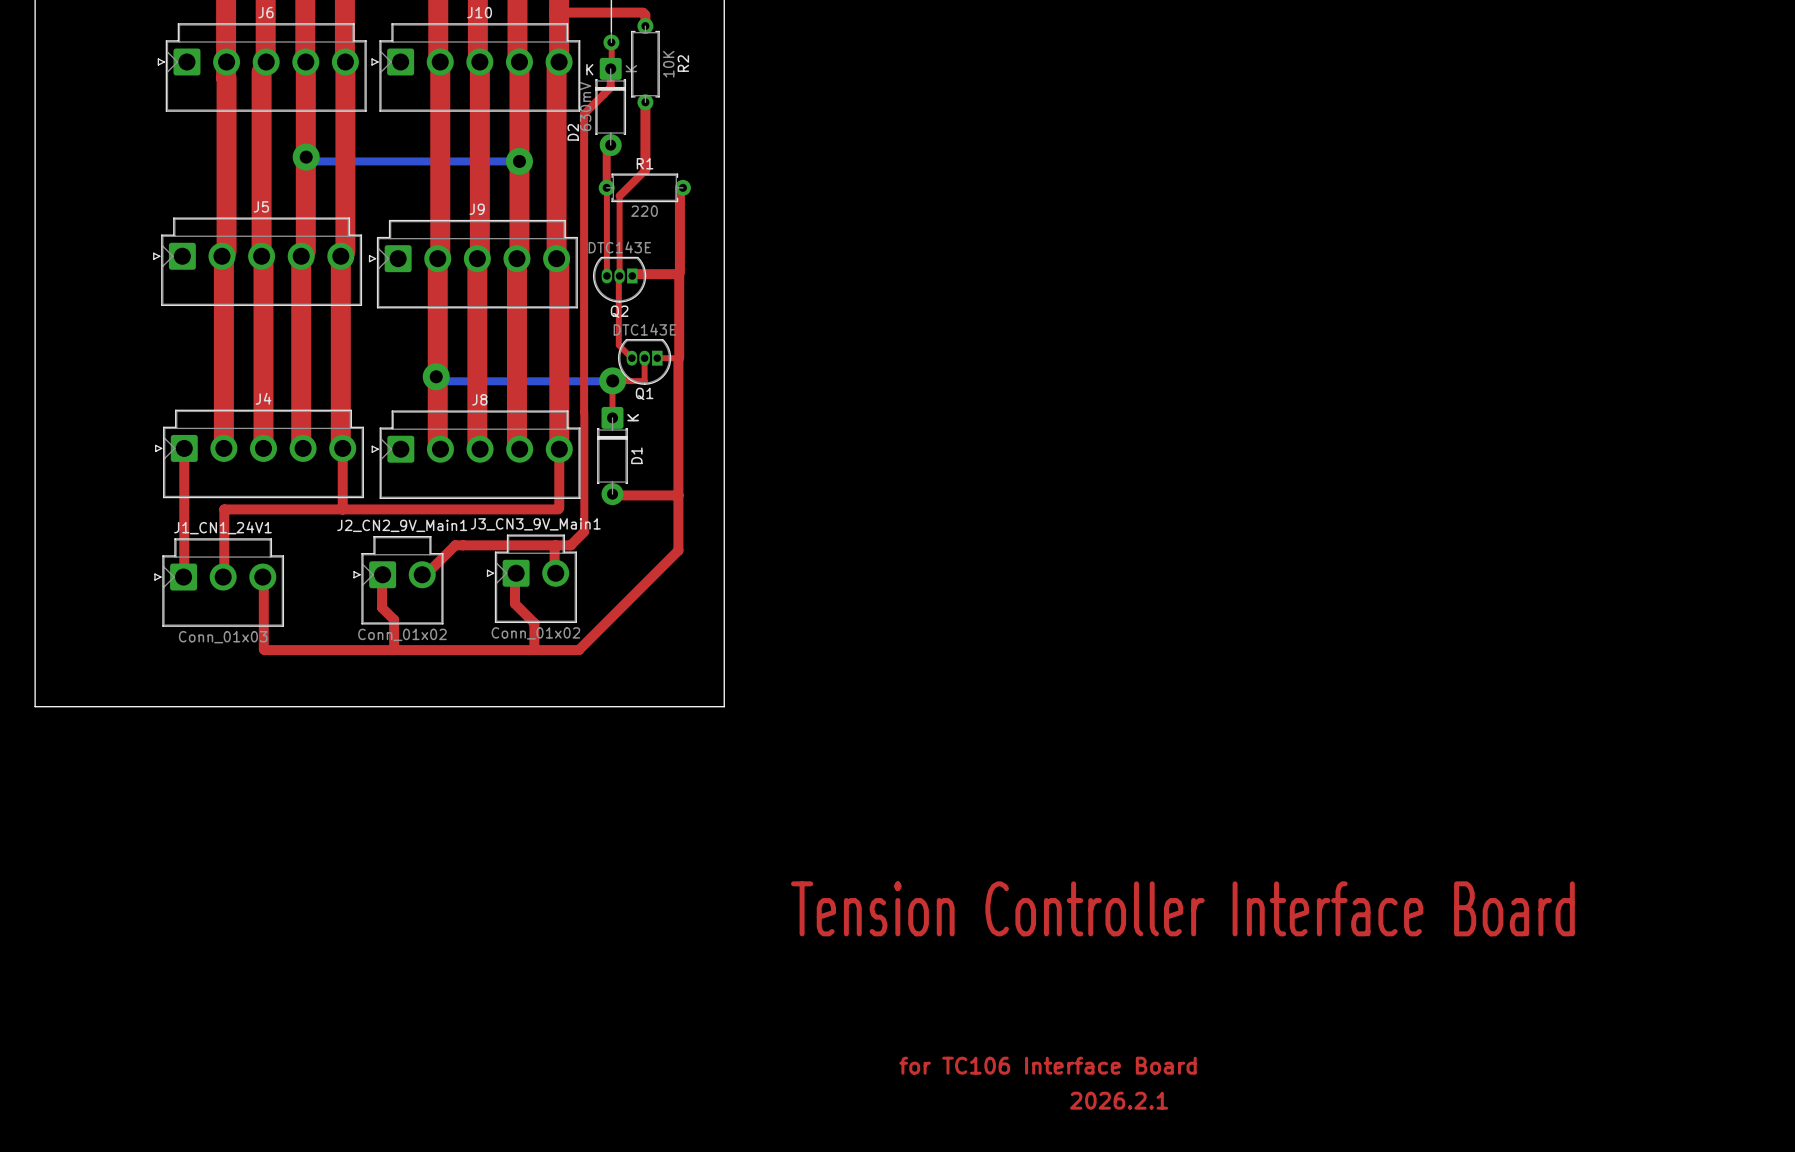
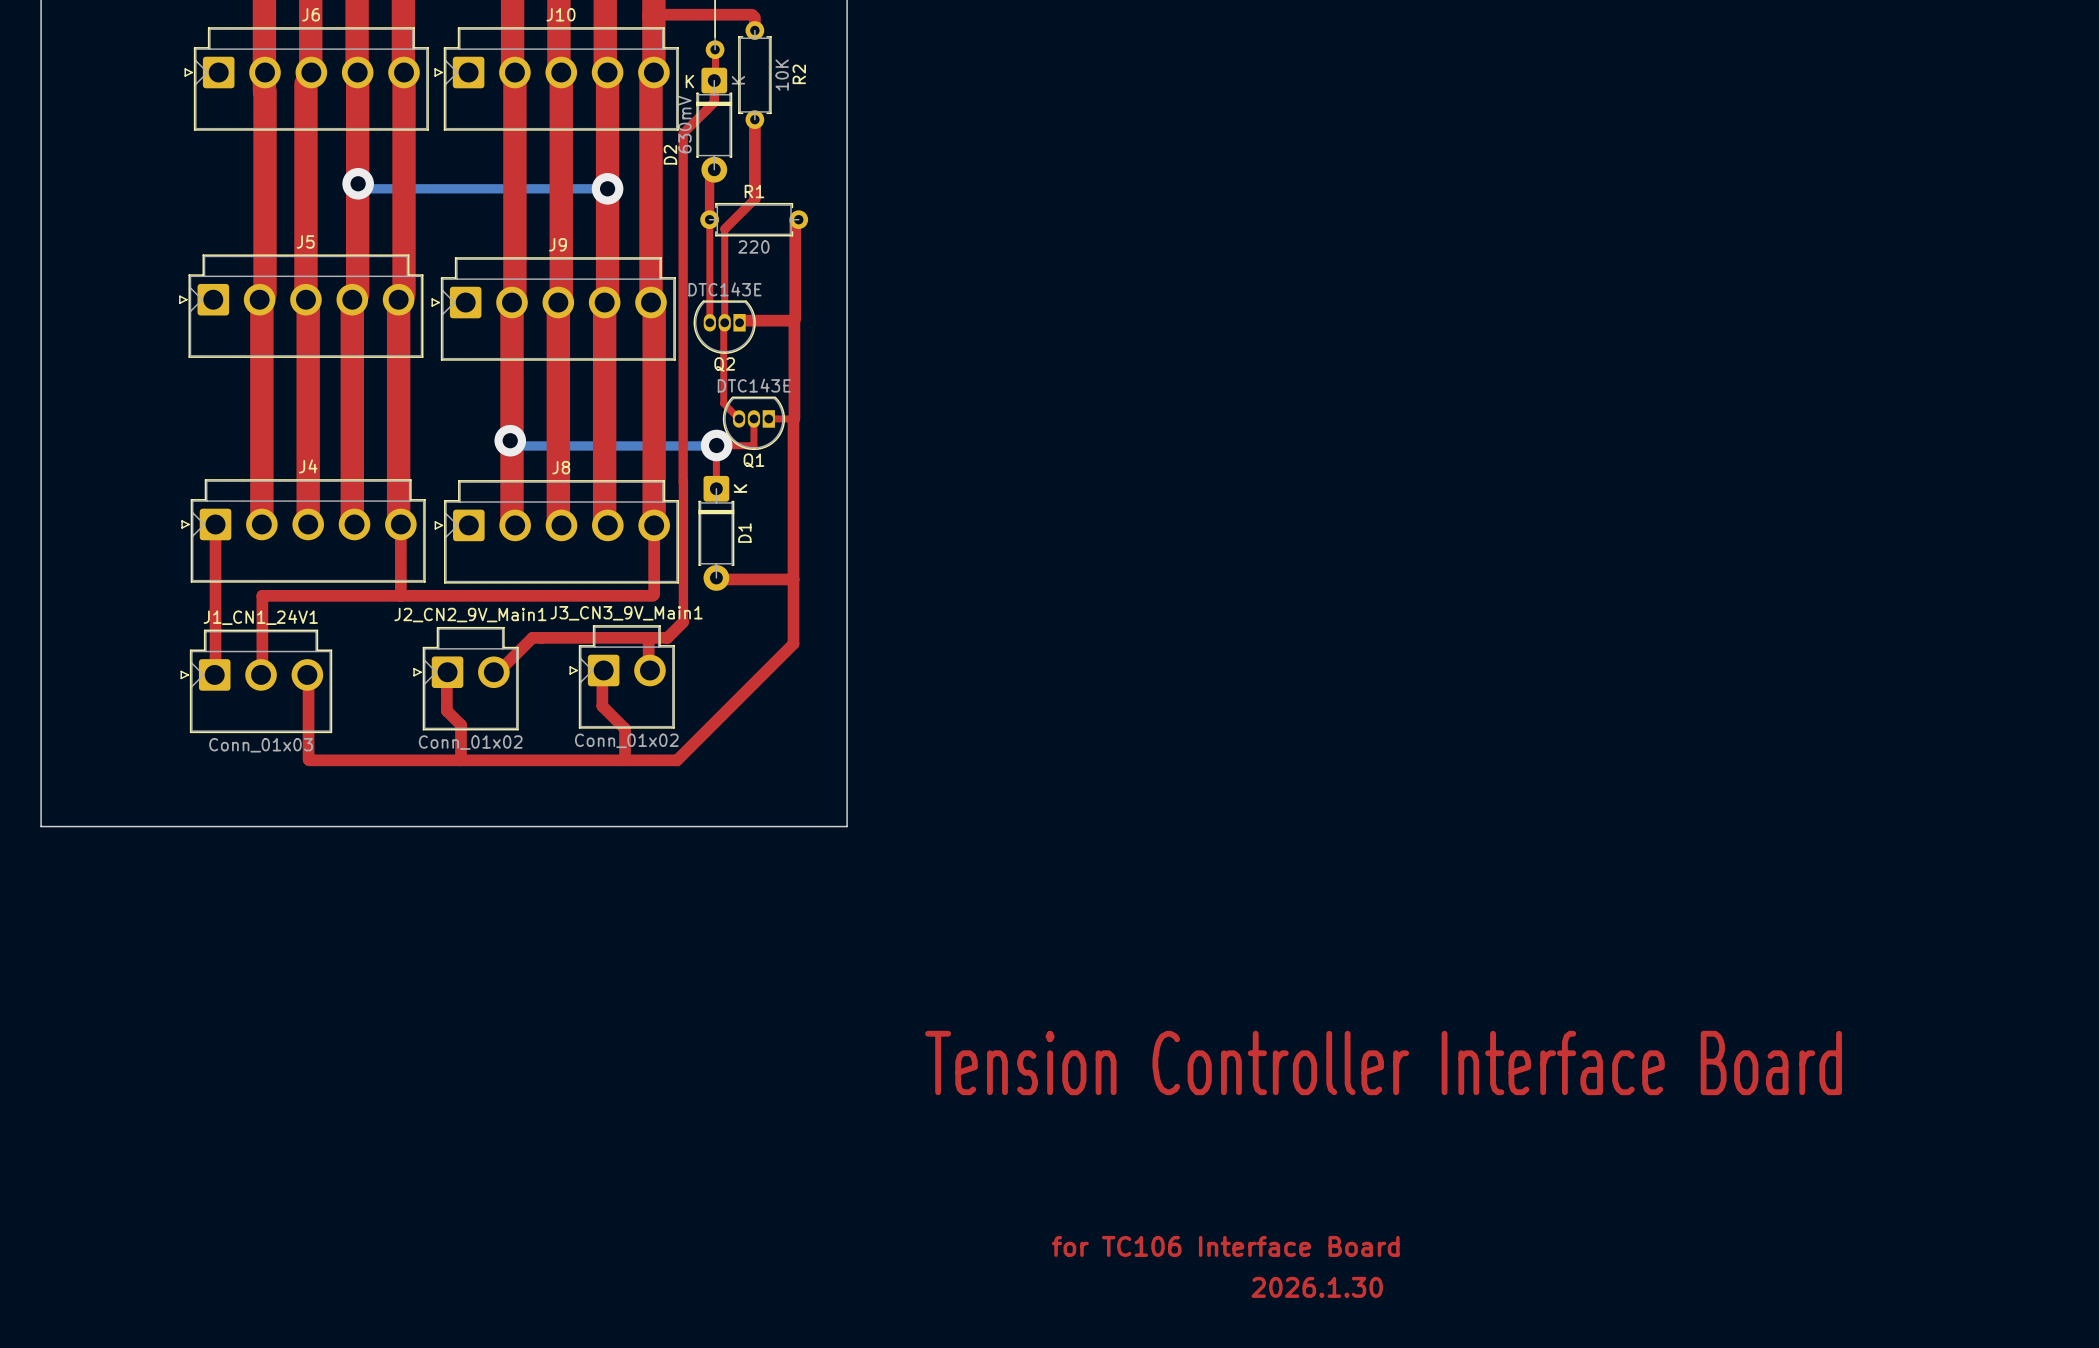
text: 2026.2.1 (1119, 1100) -> 2026.1.30 (1317, 1287)

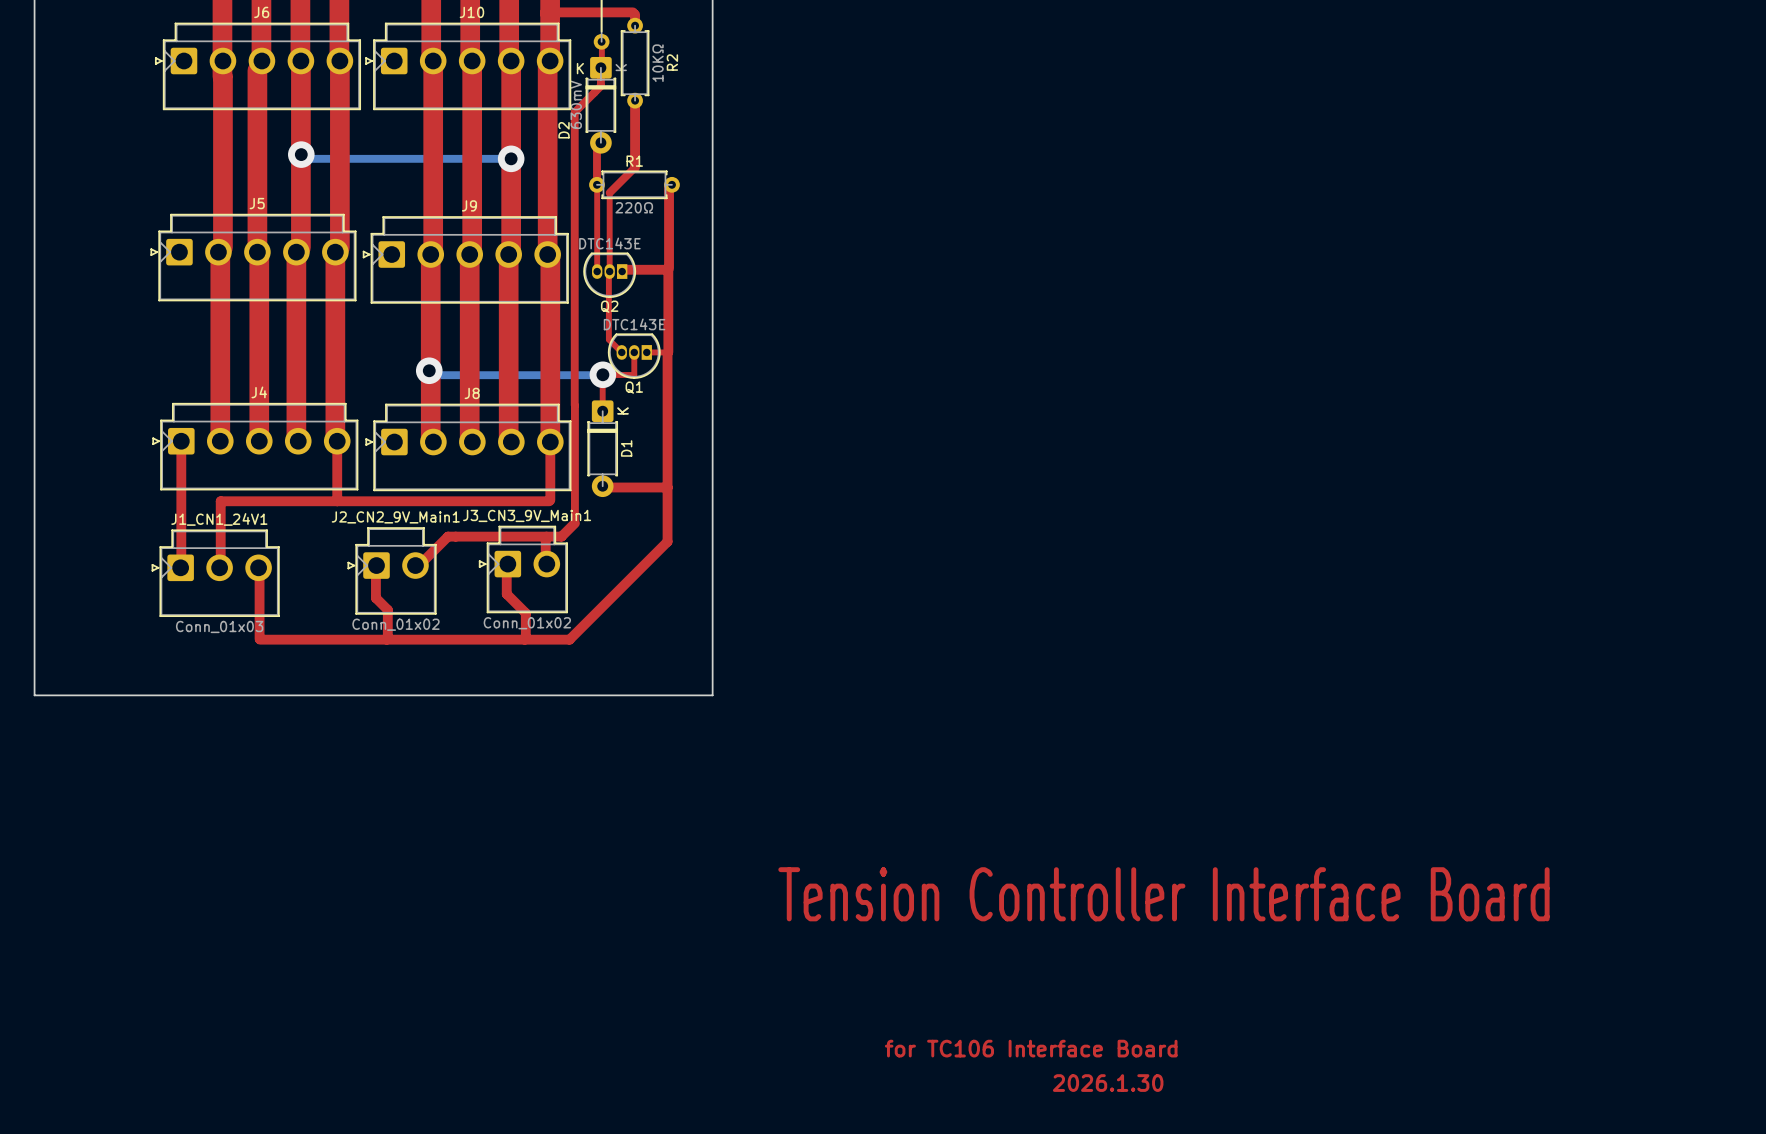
R2 value: 10K (782, 75) -> 10KΩ (658, 63)
R1 value: 220 (753, 246) -> 220Ω (634, 207)

